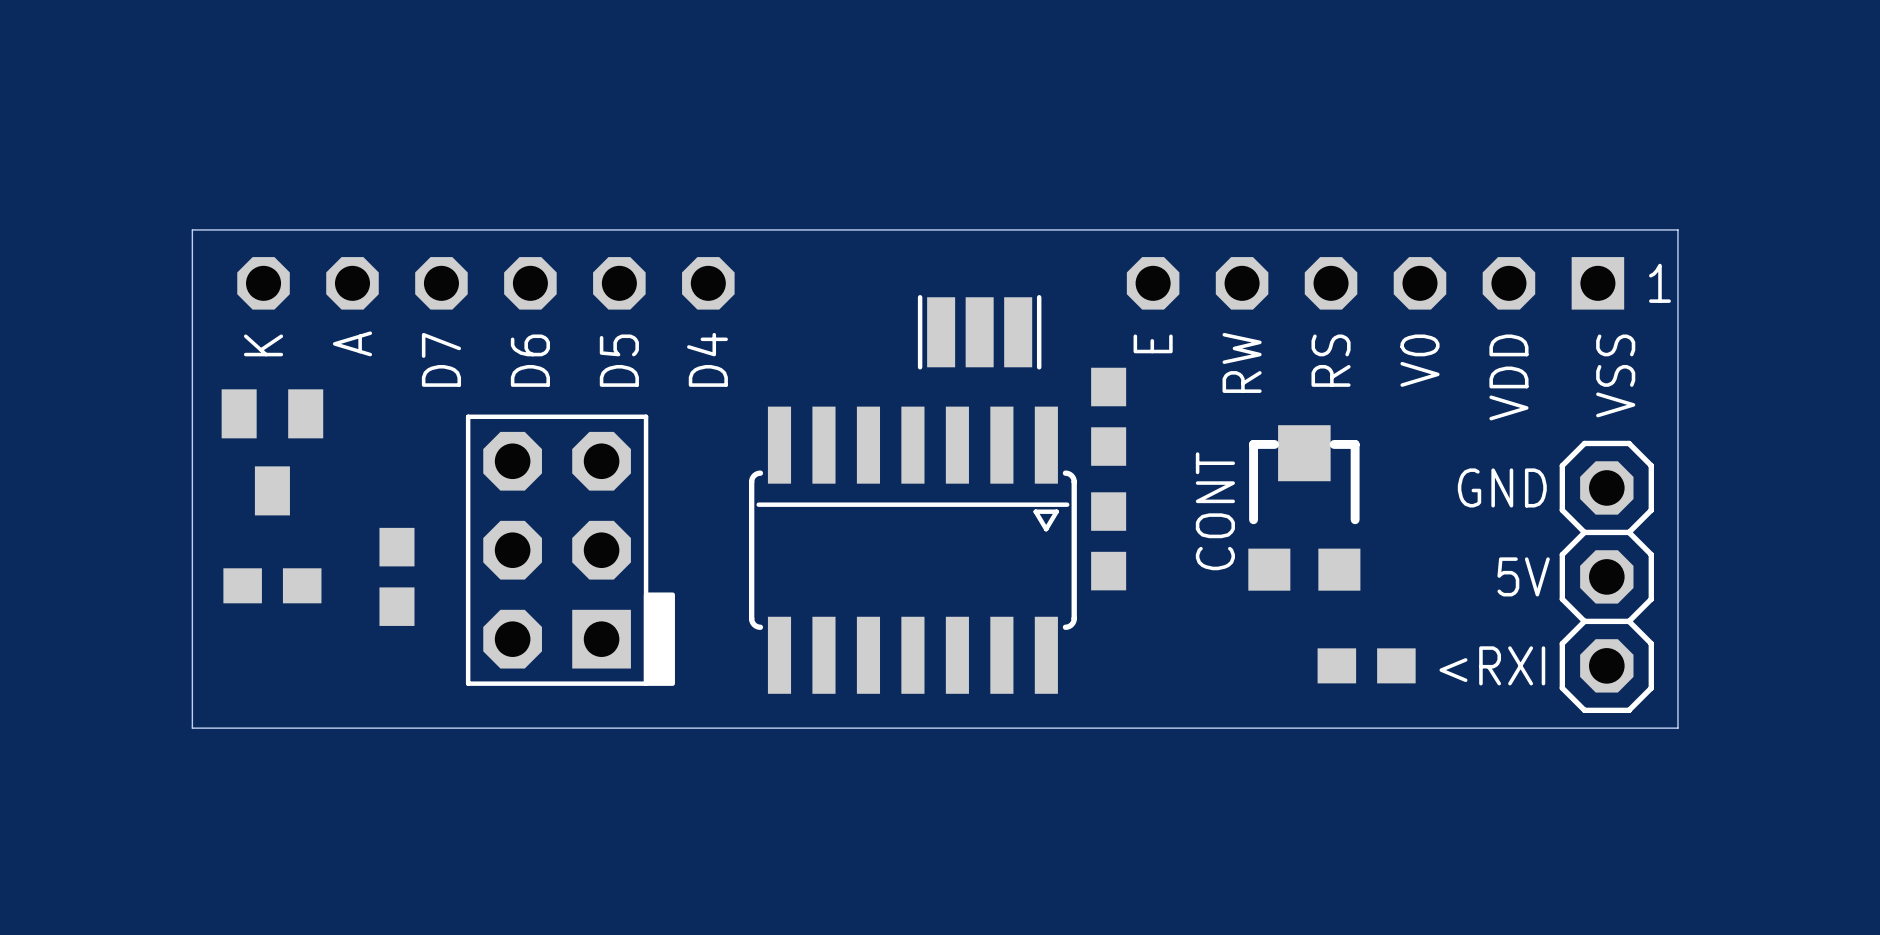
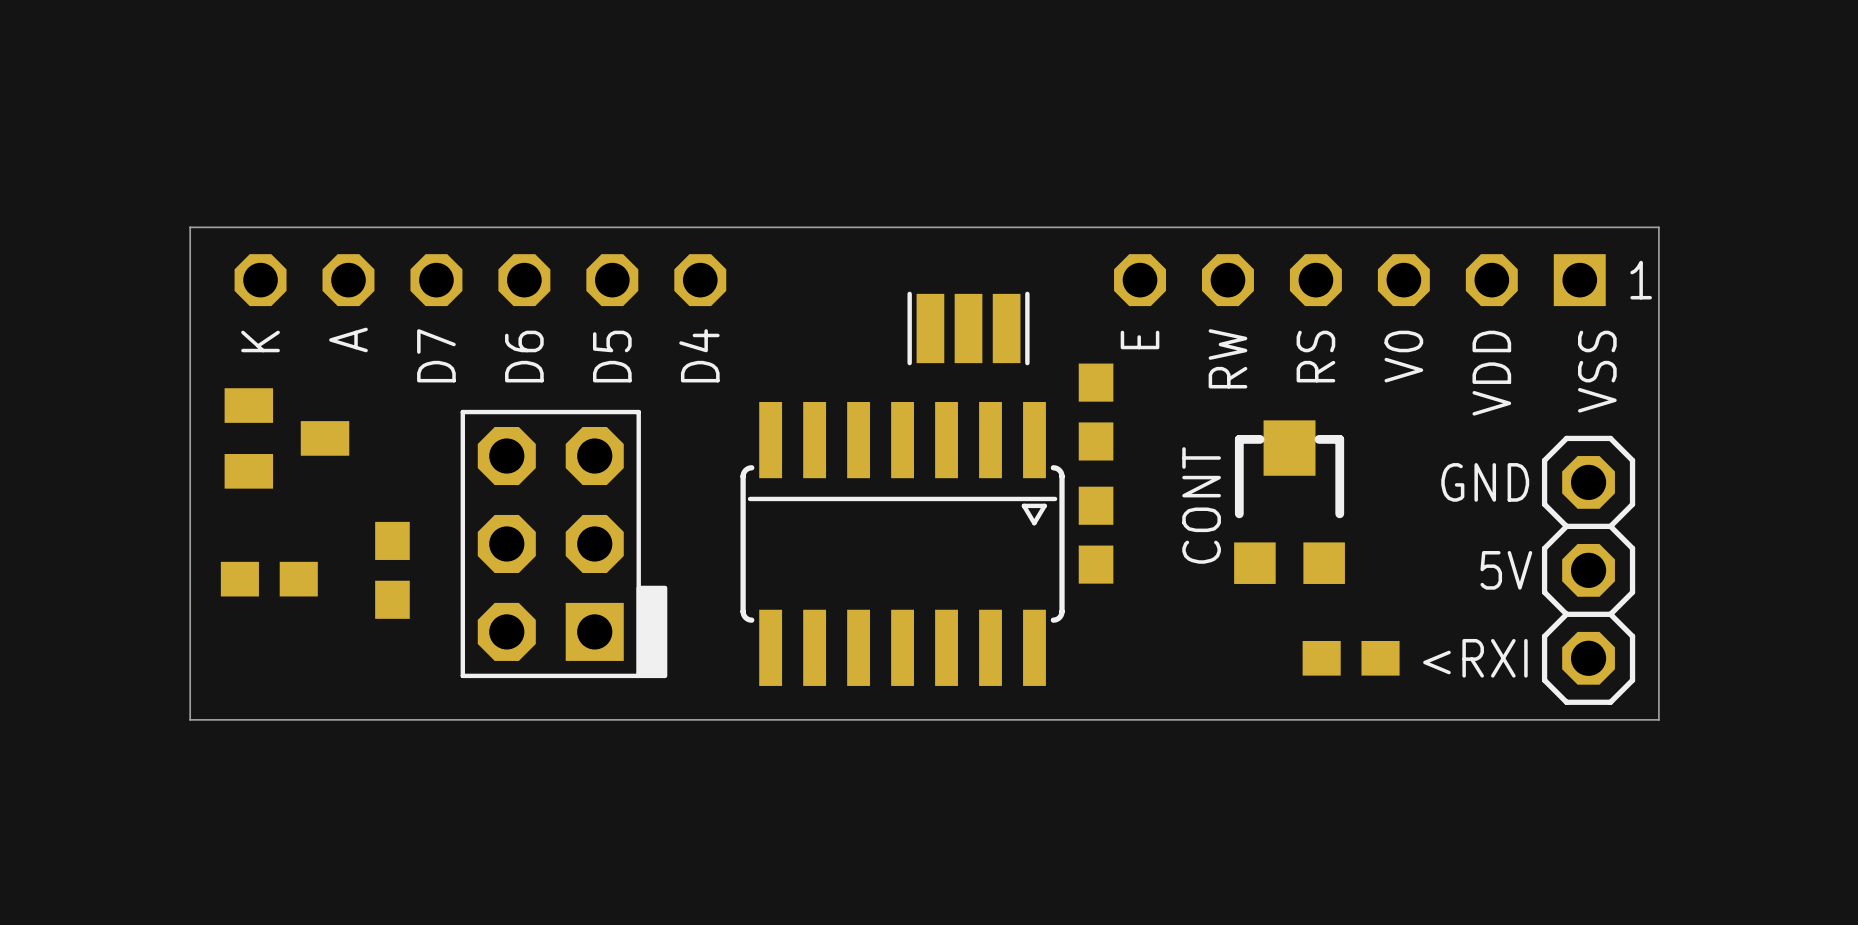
part rotation: 0° (272, 452) -> 90° counterclockwise (286, 438)

